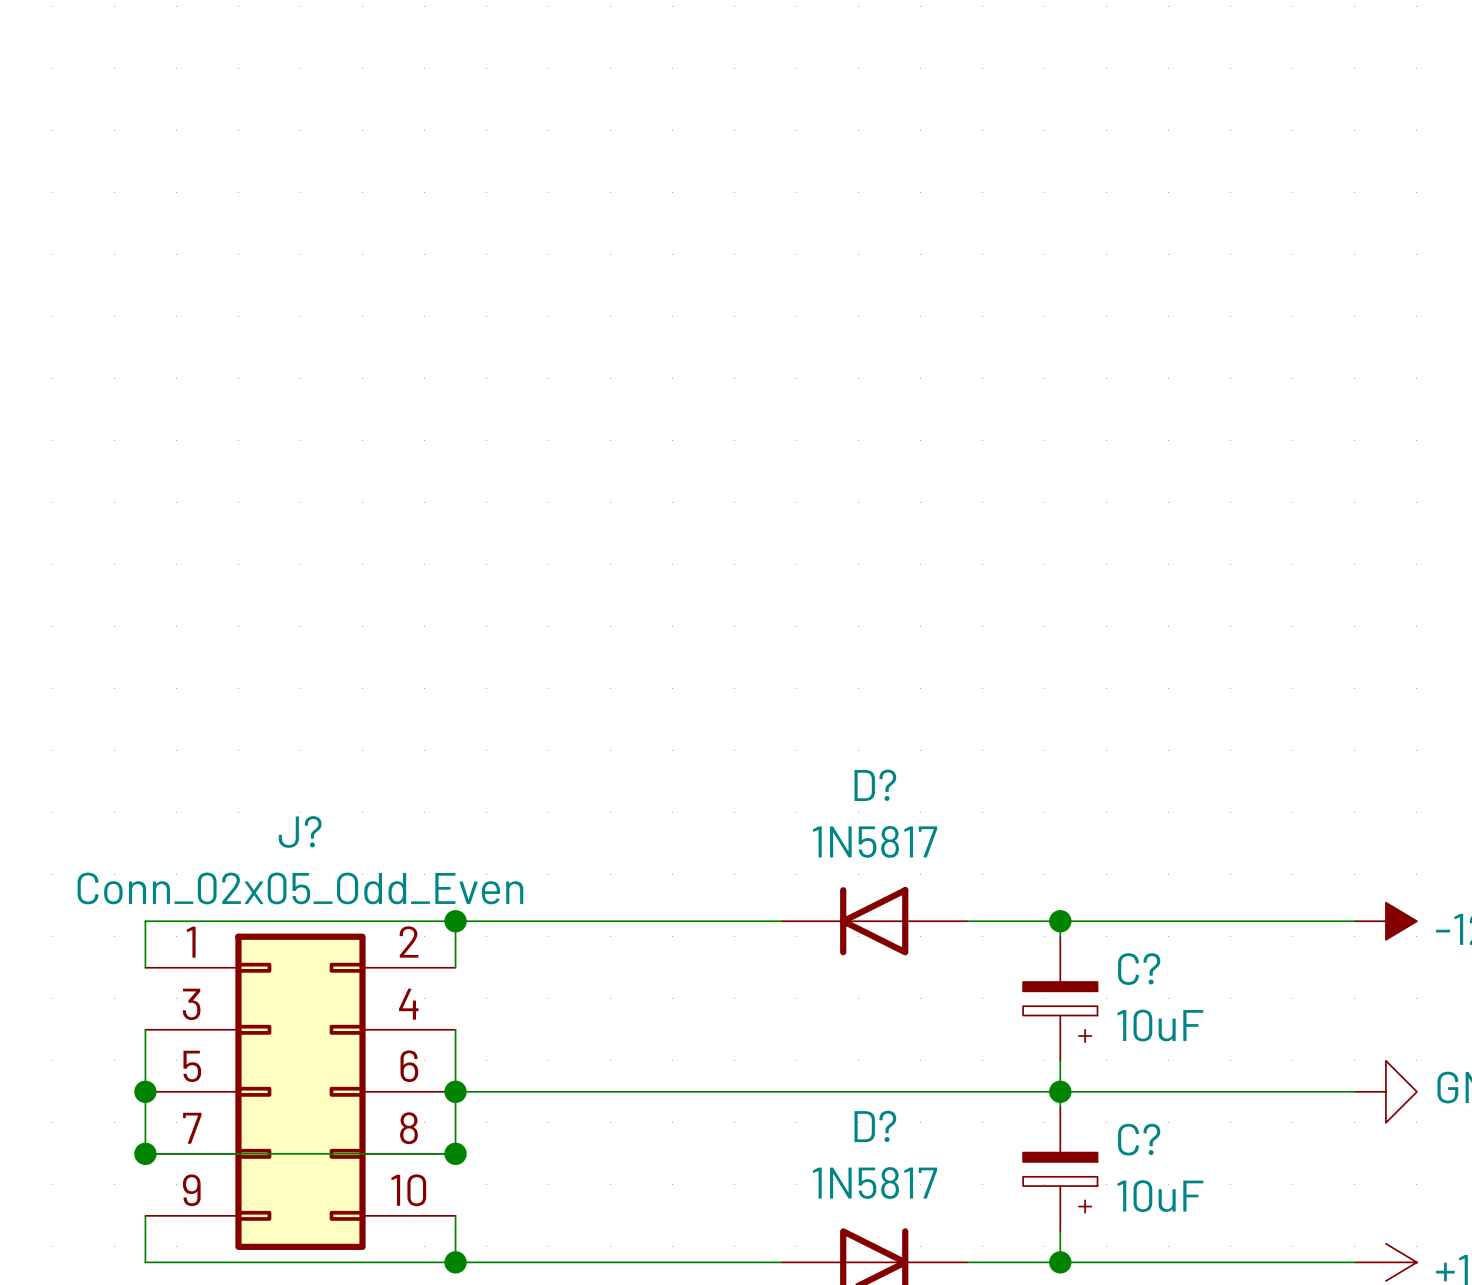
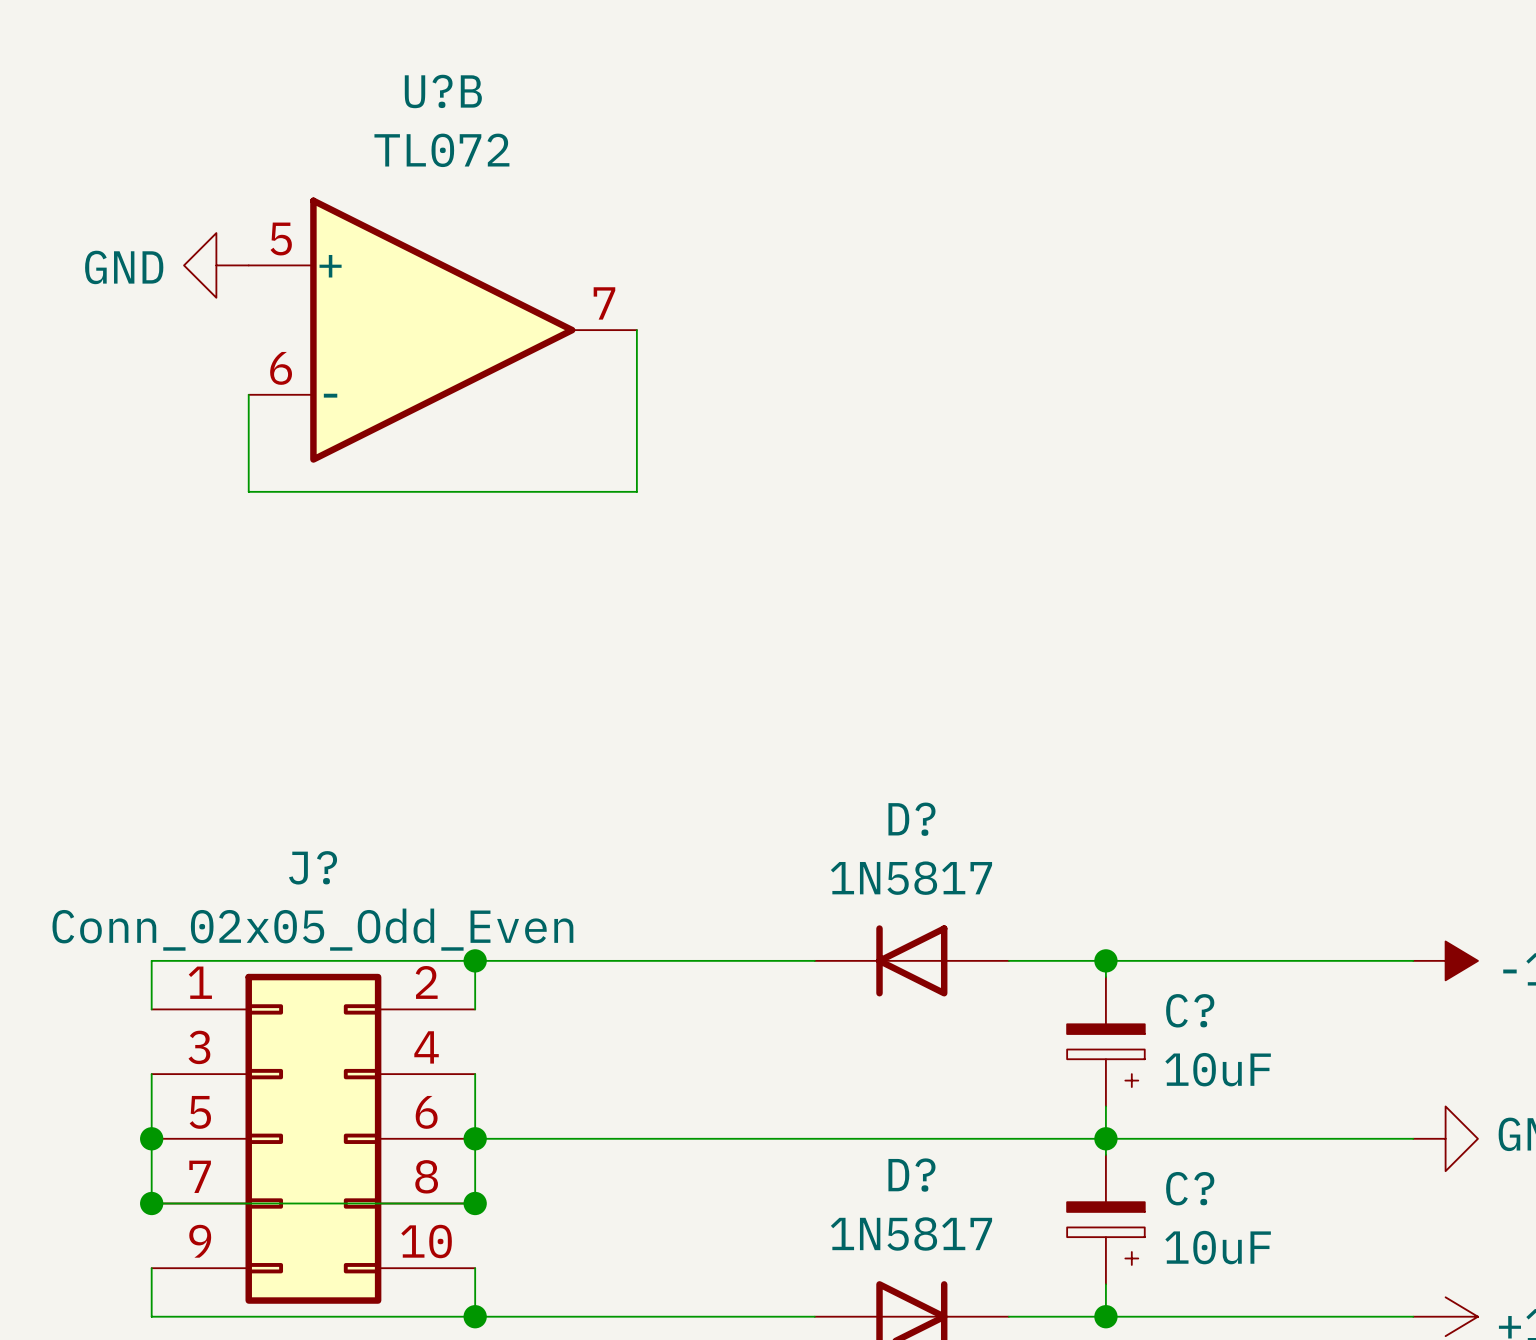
power symbol: none -> GND (216, 265)
U?B: none -> TL072 (442, 330)
wire: none -> (636, 330) (636, 491) (248, 491) (248, 394)

